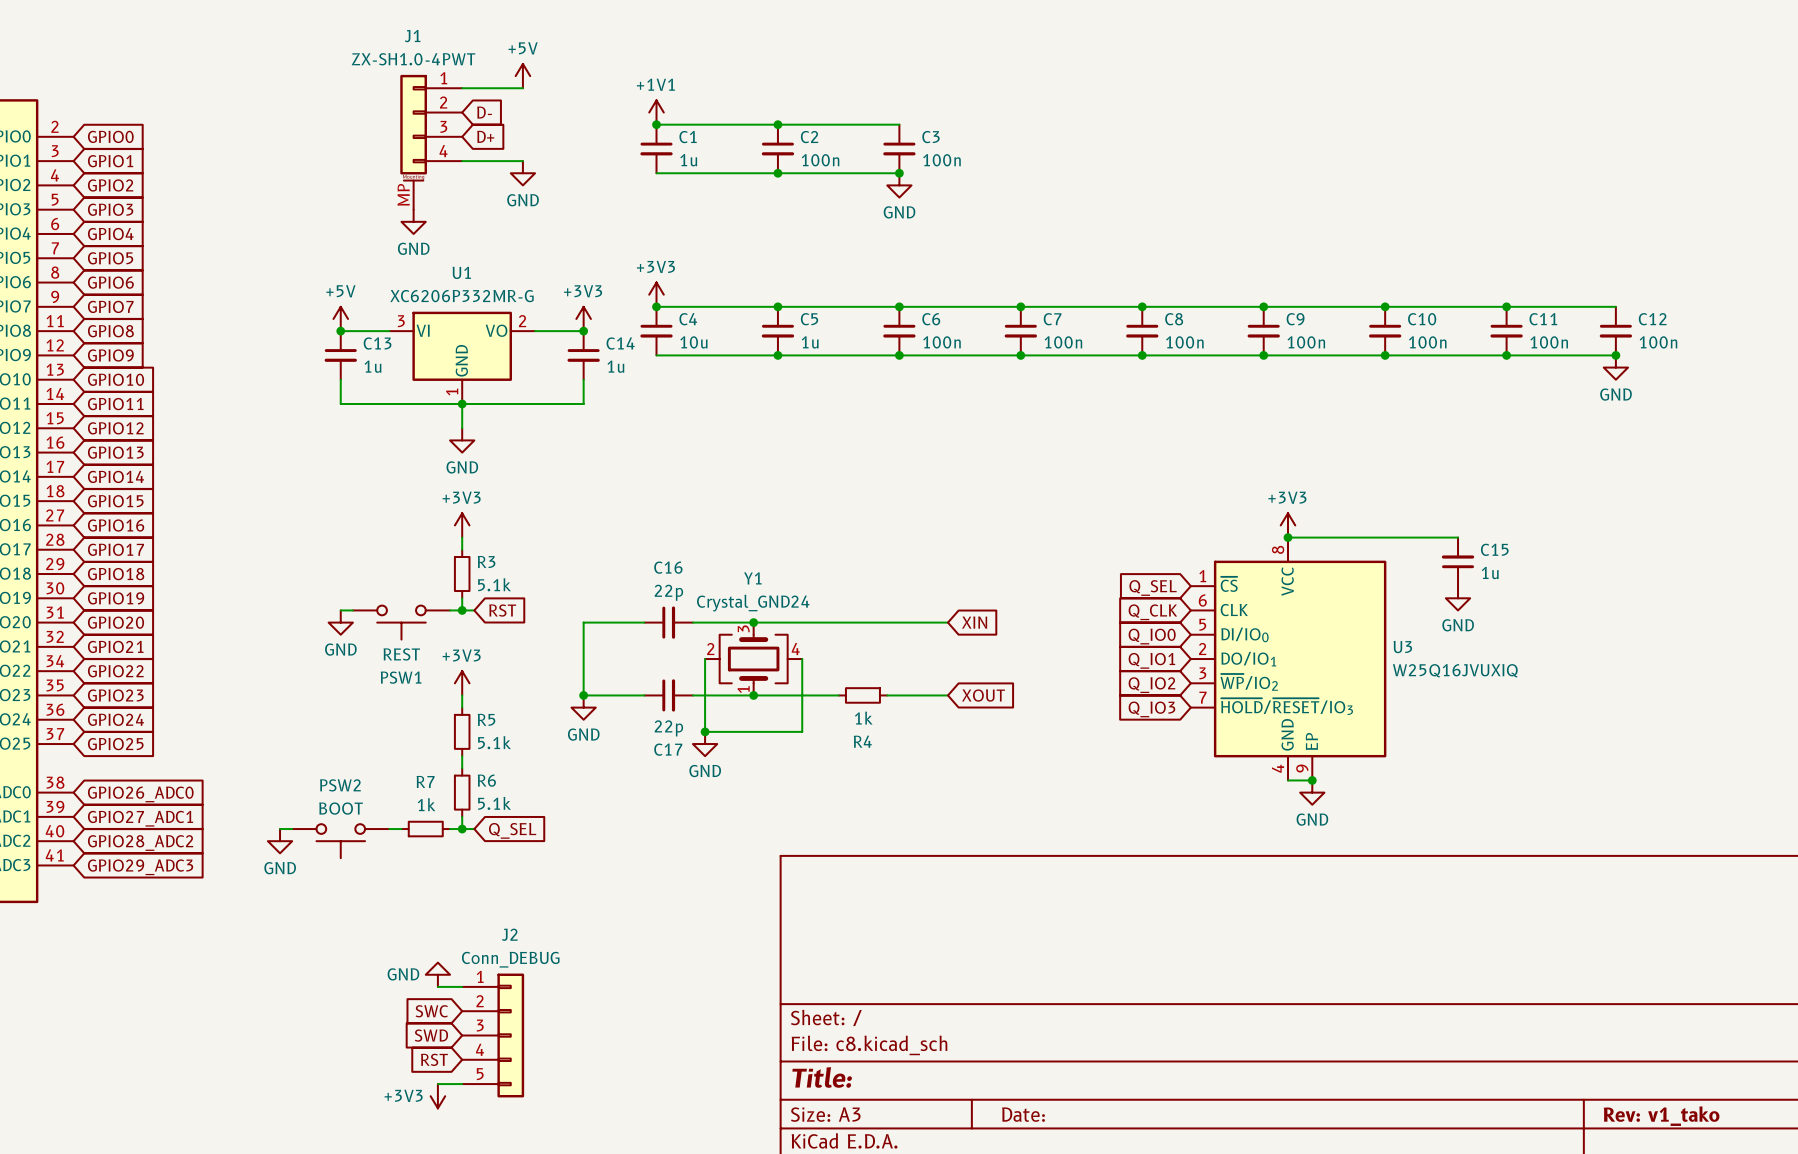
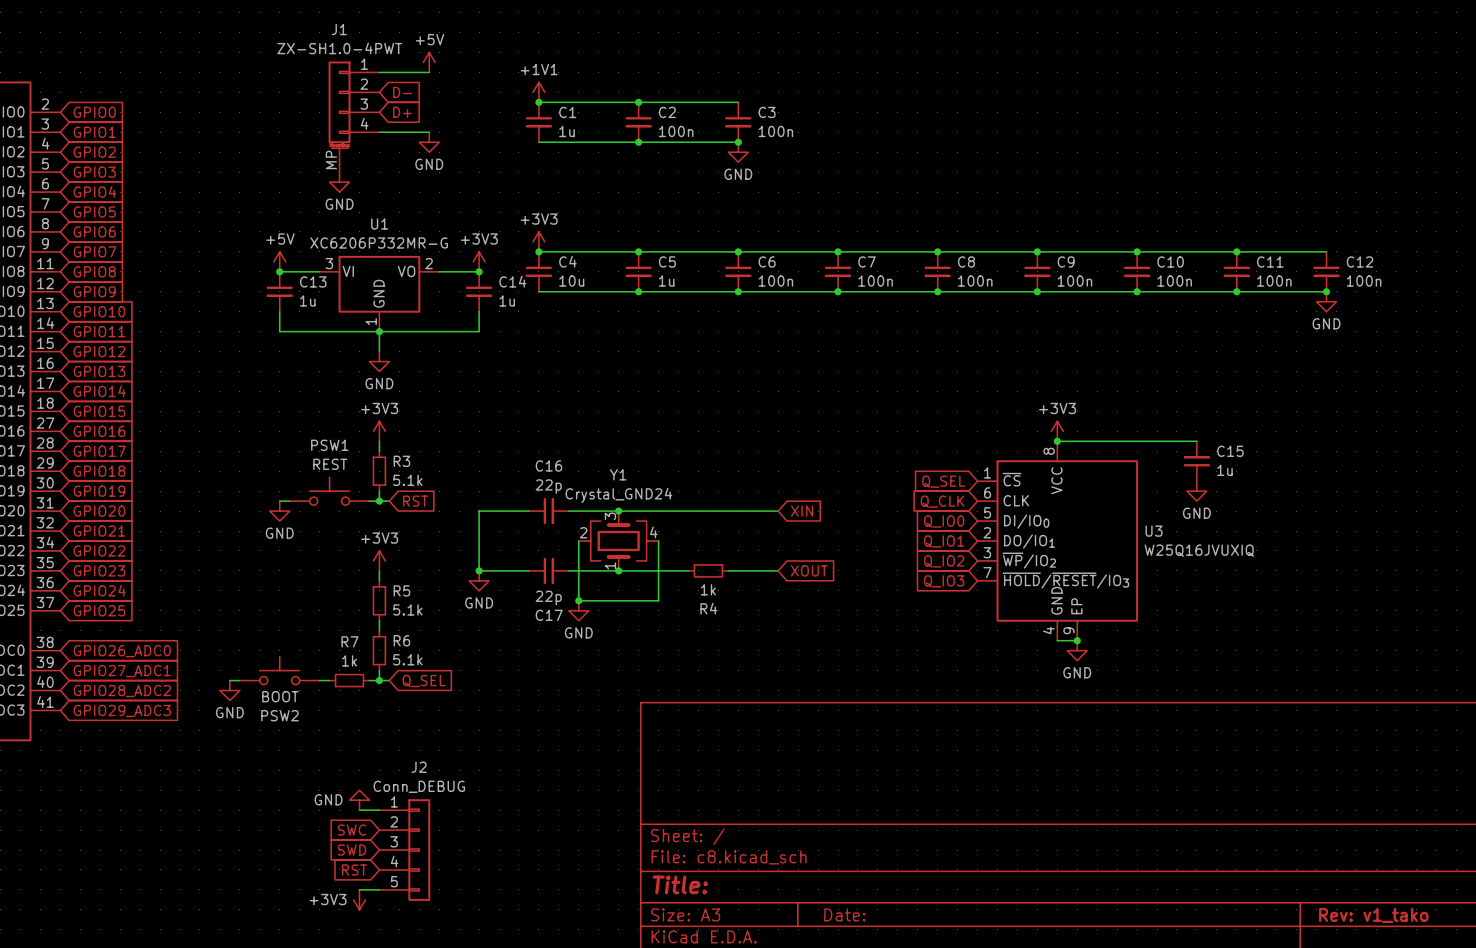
PSW1 rotation: 0° (401, 622) -> 180° (329, 491)
PSW2 rotation: 0° (340, 841) -> 180° (279, 670)

